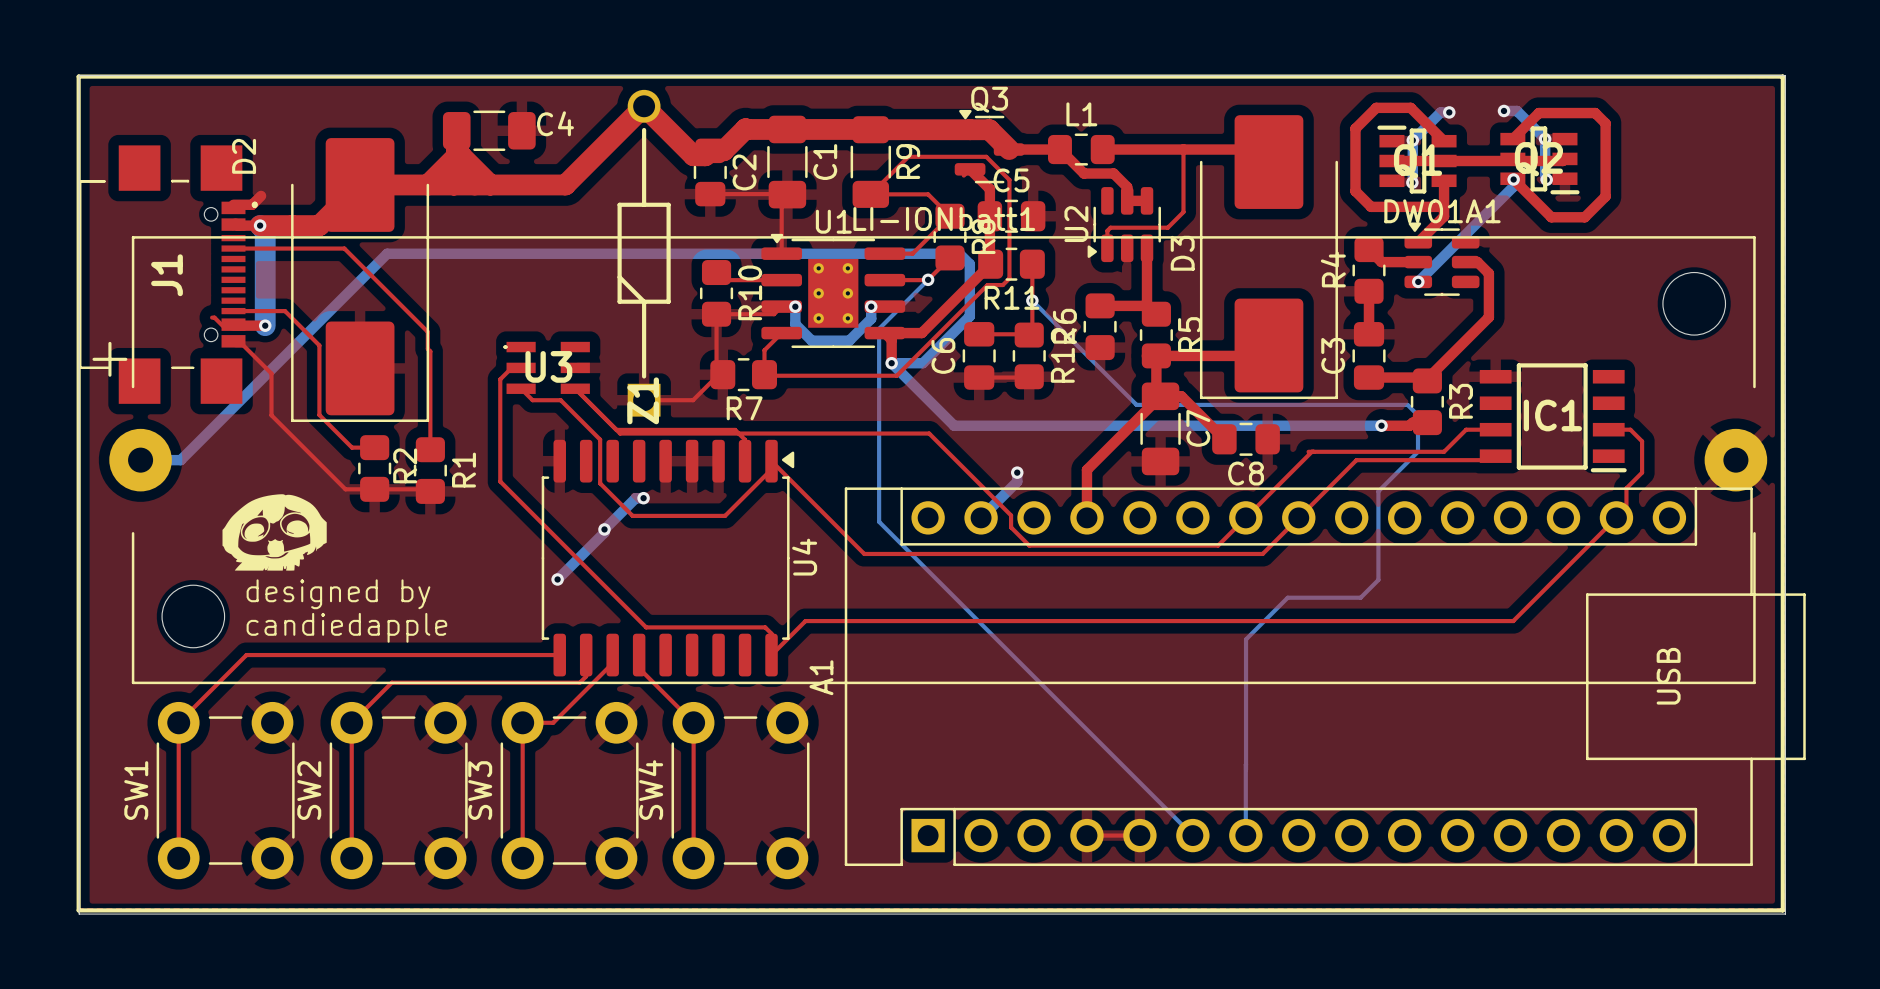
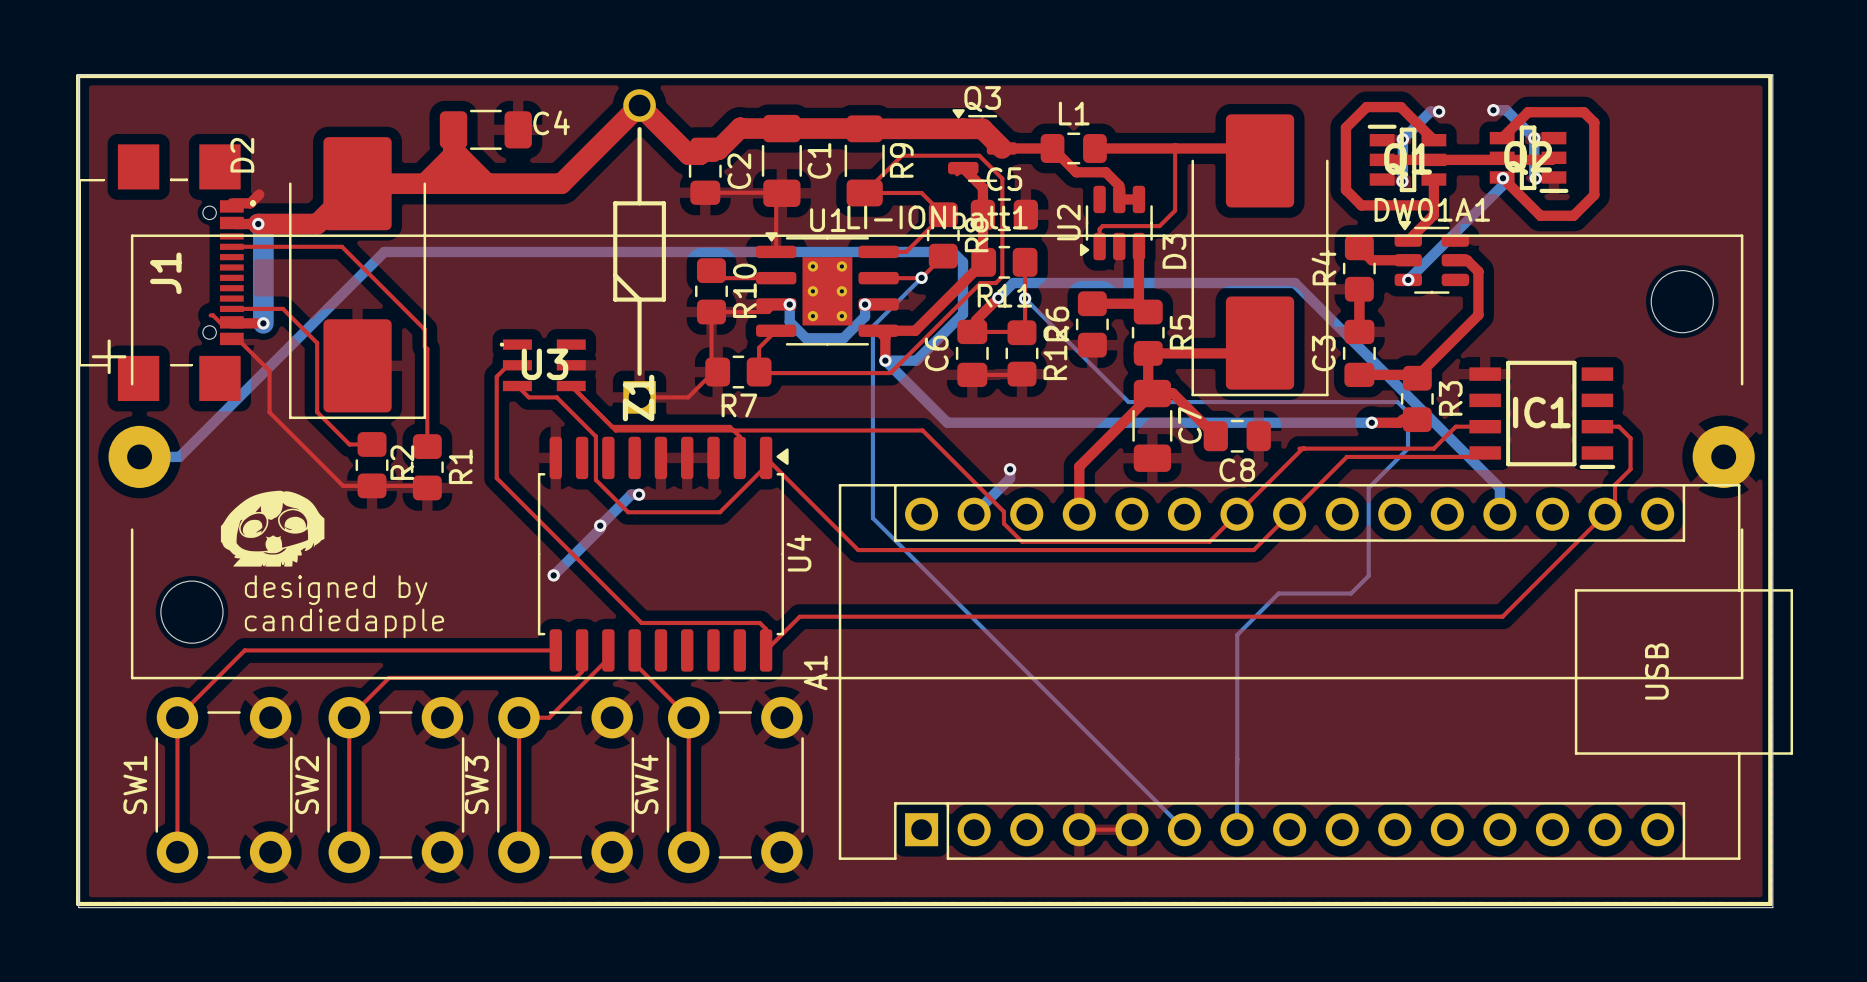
top track: none -> (998, 297) (975, 320)
bottom track: none -> (998, 297) (1013, 283) (1294, 283) (1499, 488) (1499, 514)
via: none -> (998, 297)

